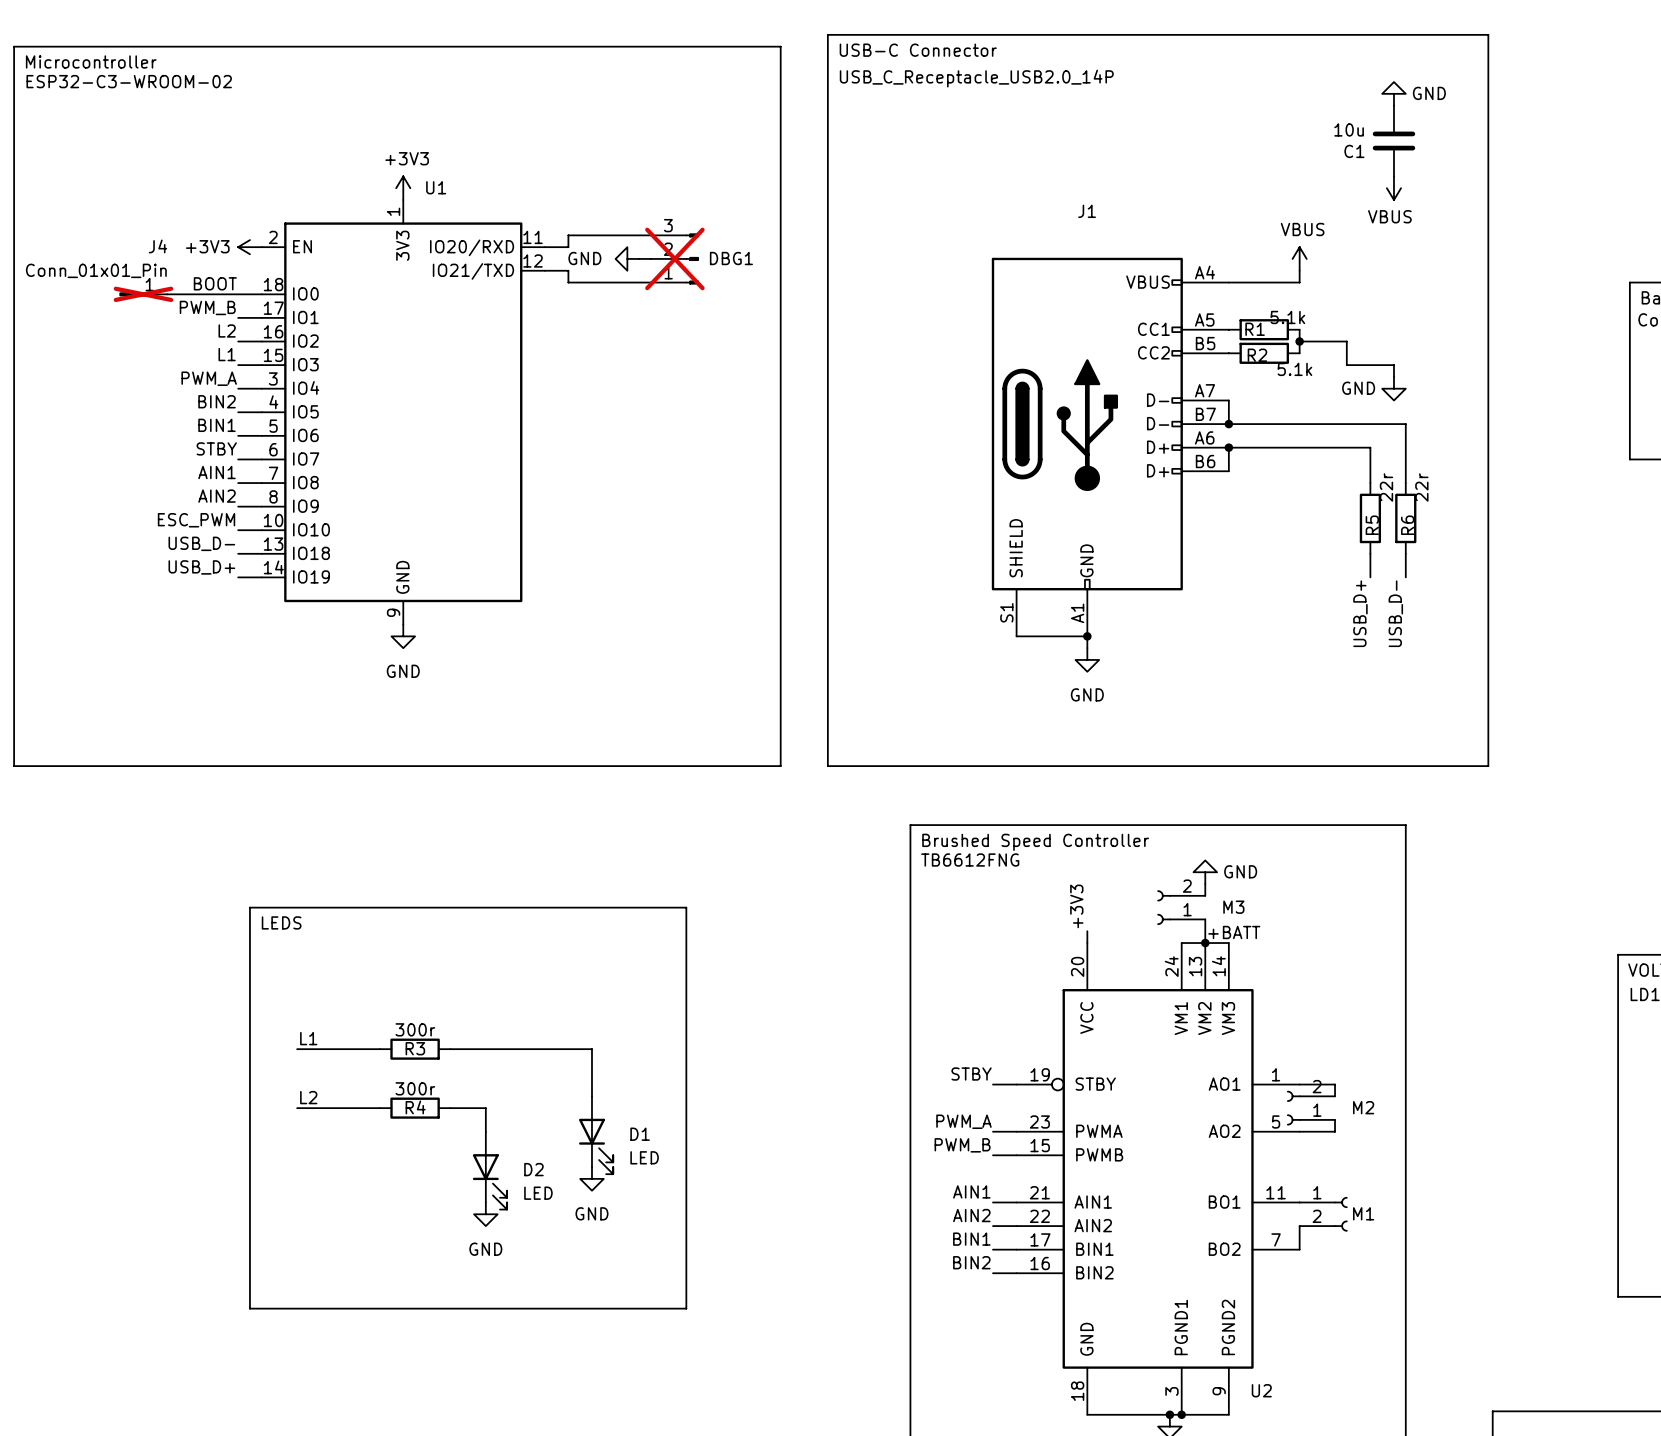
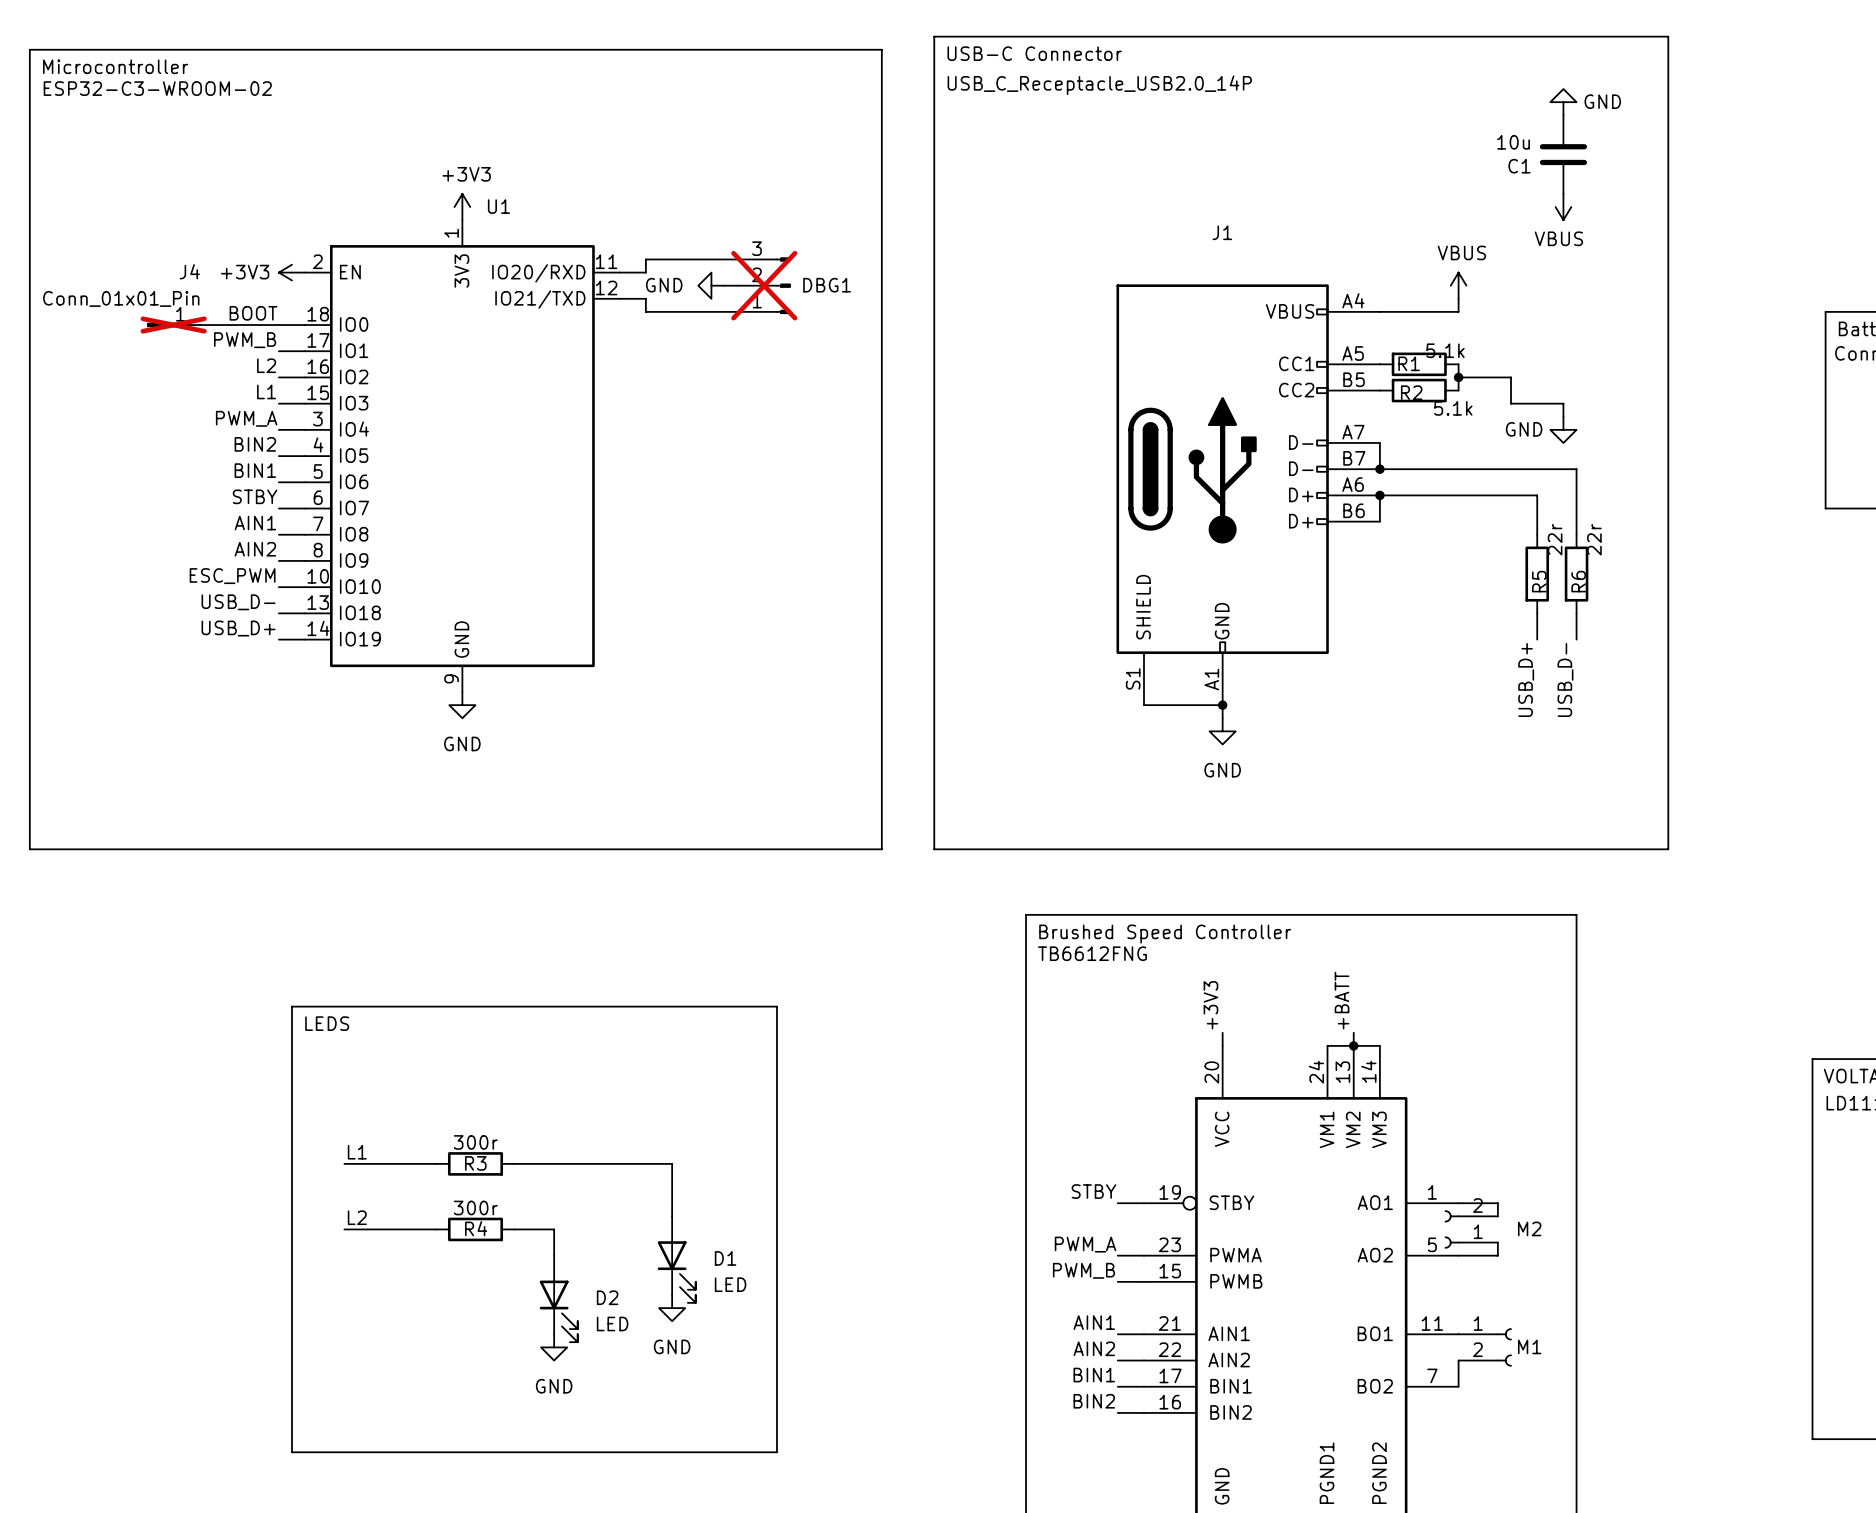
power symbol: GND (1205, 872) -> none
wire: (1205, 884) (1205, 895) -> none
M3: (1181, 907) -> none
wire: (1205, 919) (1205, 931) -> none
label rotation: 0° (1234, 932) -> 90° counterclockwise (1342, 1000)

